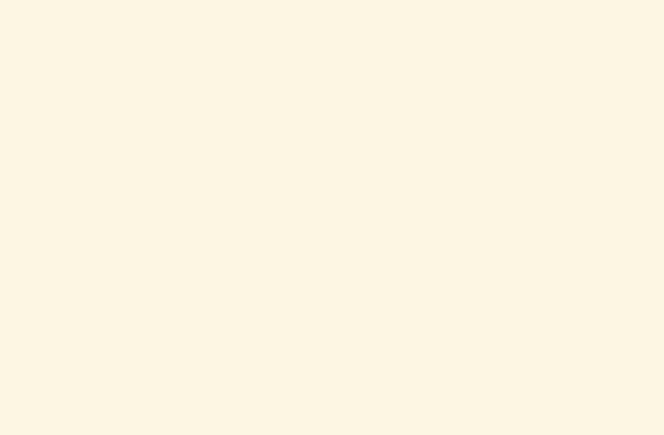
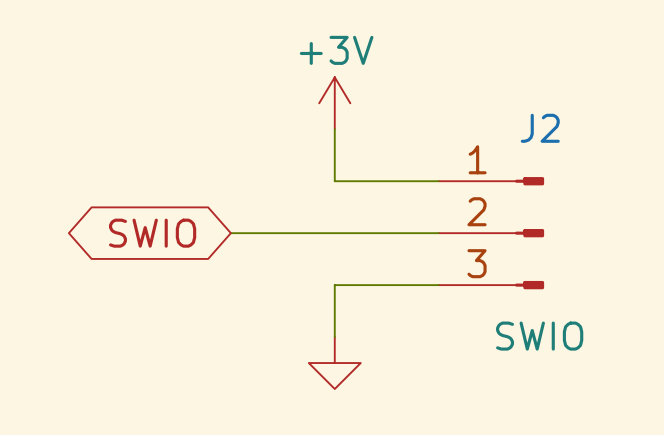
power symbol: none -> +3V (334, 103)
wire: none -> (334, 129) (334, 181) (438, 181)
global label: none -> SWIO (152, 233)
wire: none -> (230, 233) (438, 233)
J2: none -> SWIO (491, 233)
wire: none -> (438, 285) (334, 285) (334, 337)
power symbol: none -> (334, 363)

